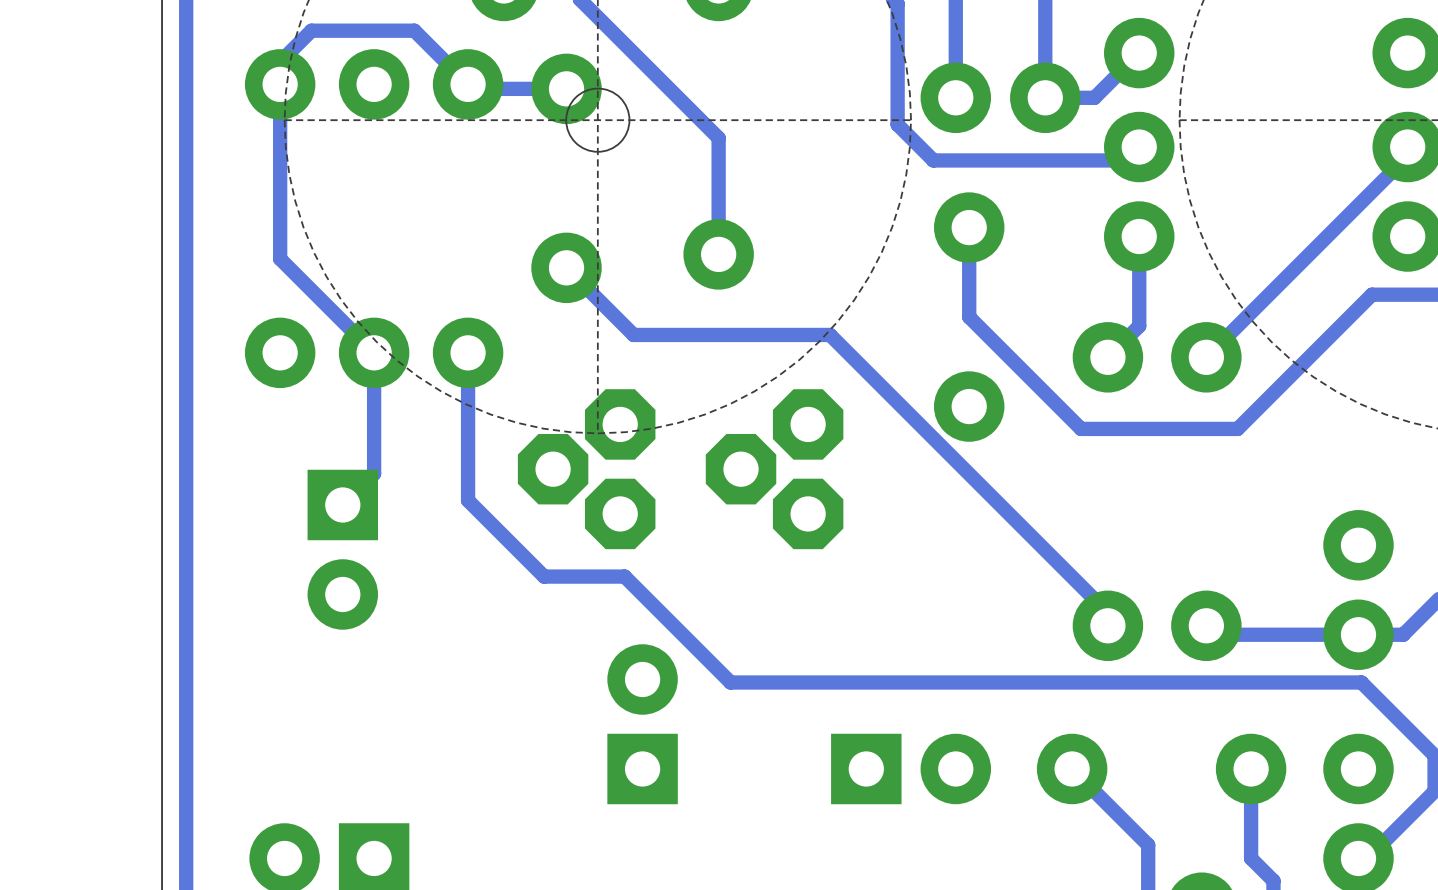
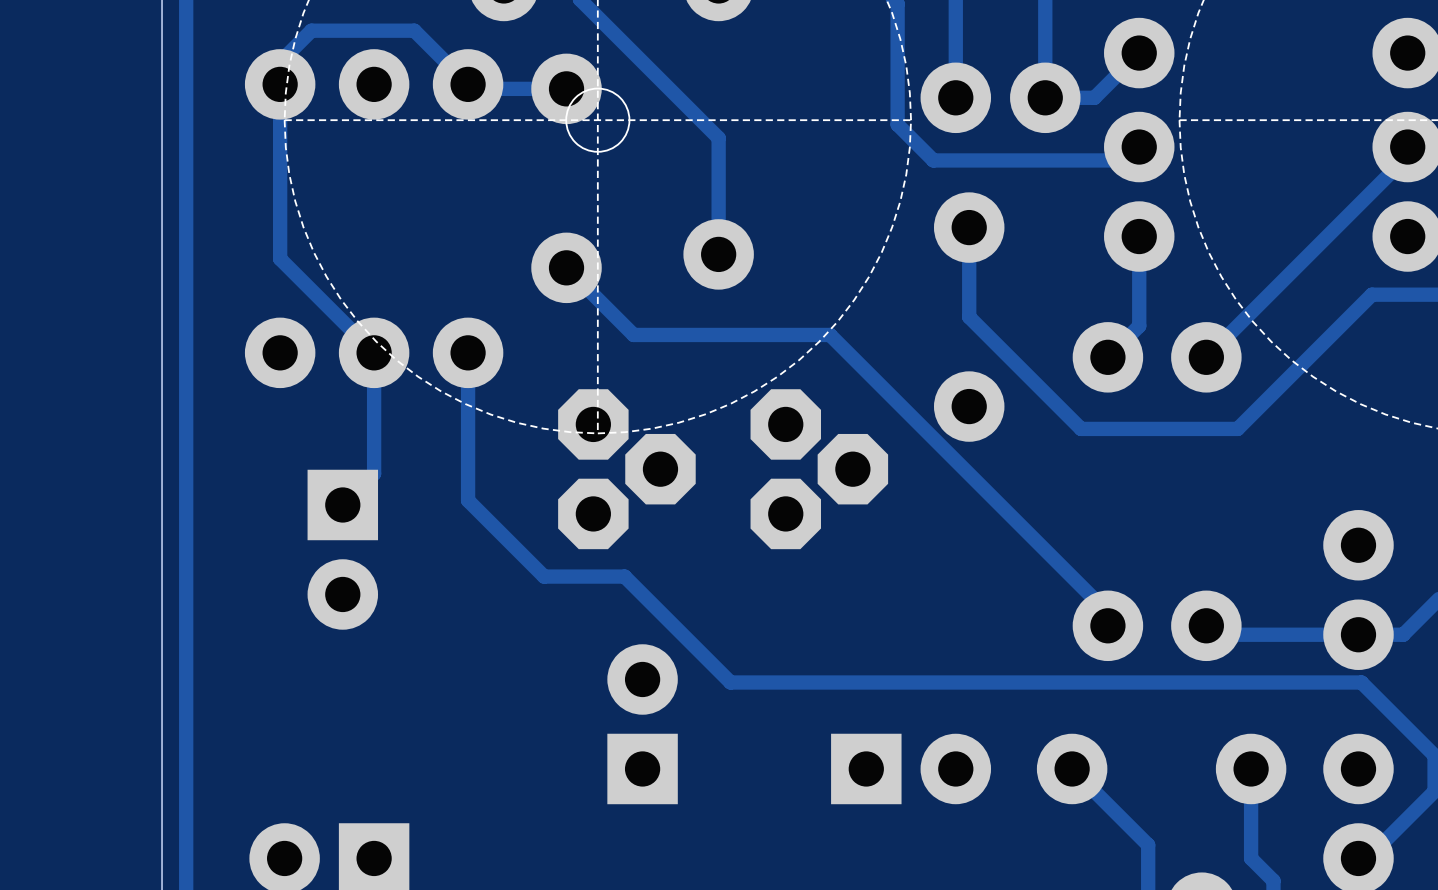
part rotation: 0° (586, 469) -> 180° (626, 469)
part rotation: 0° (774, 469) -> 180° (819, 469)

